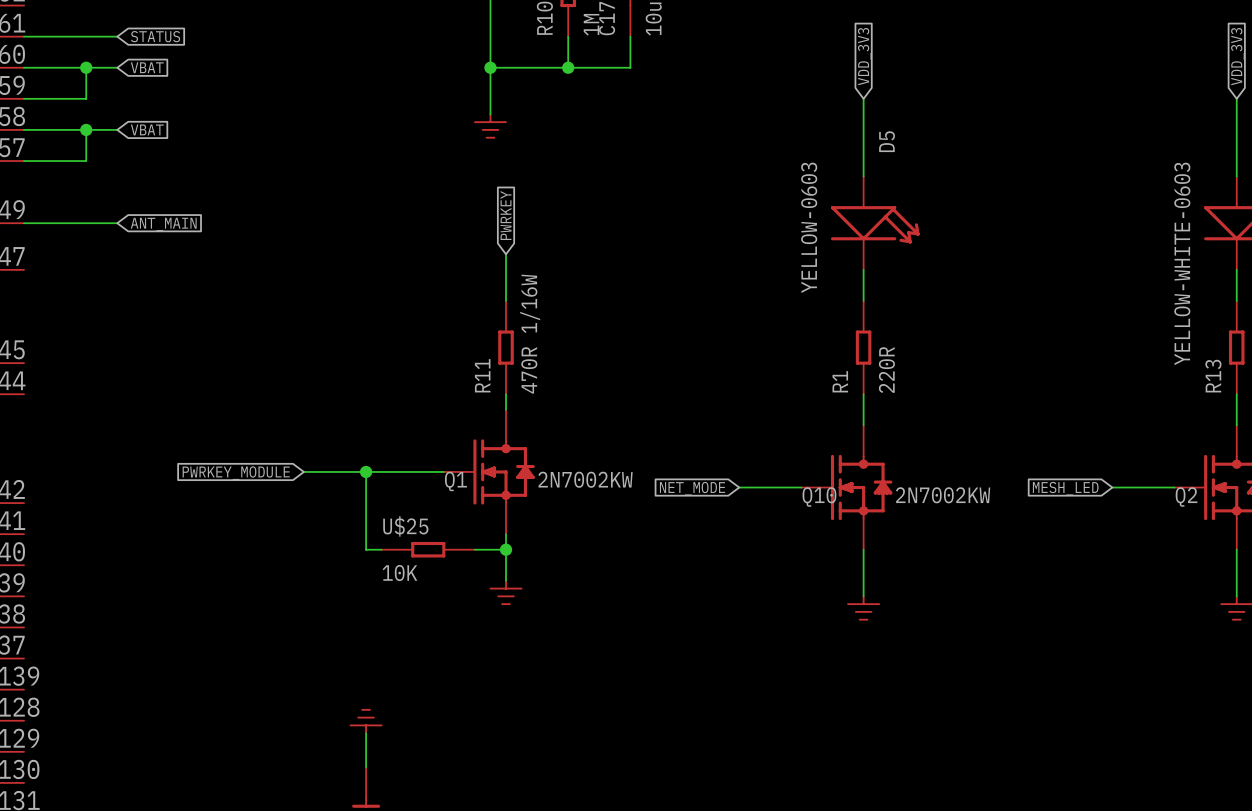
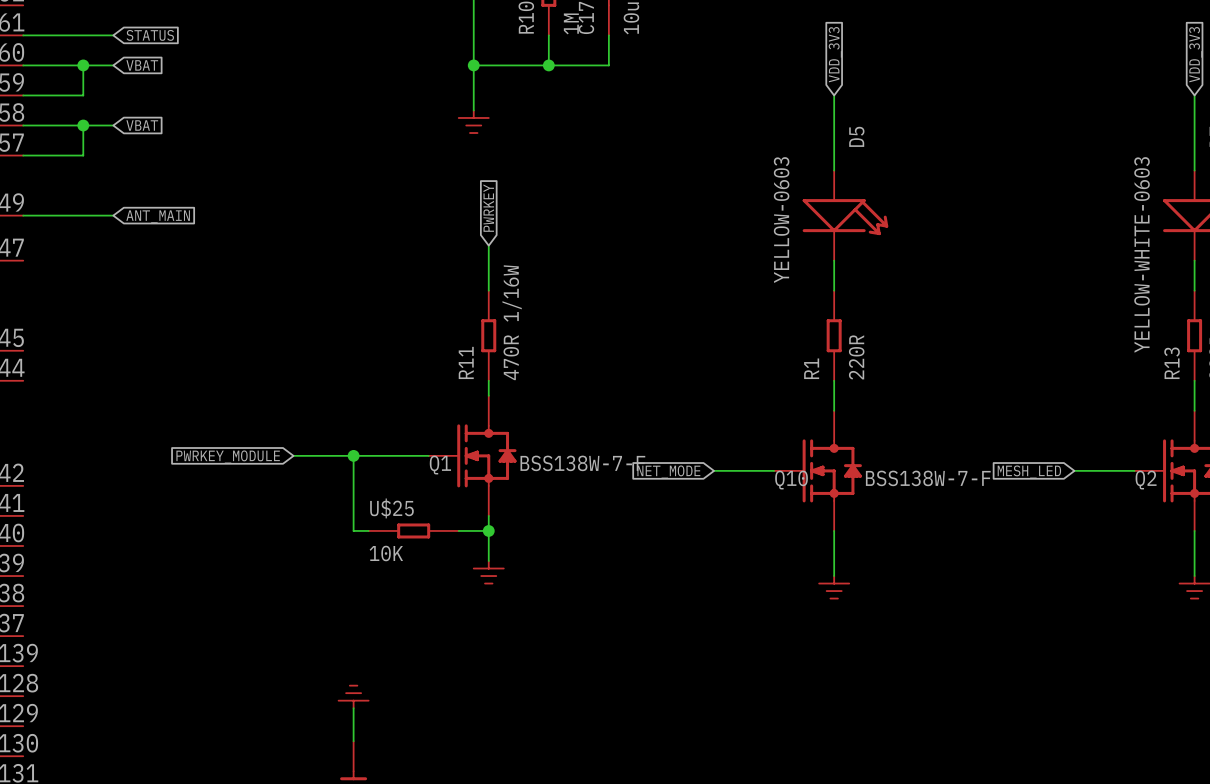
Q1 value: 2N7002KW (585, 479) -> BSS138W-7-F (582, 463)
Q10 value: 2N7002KW (943, 495) -> BSS138W-7-F (928, 478)

